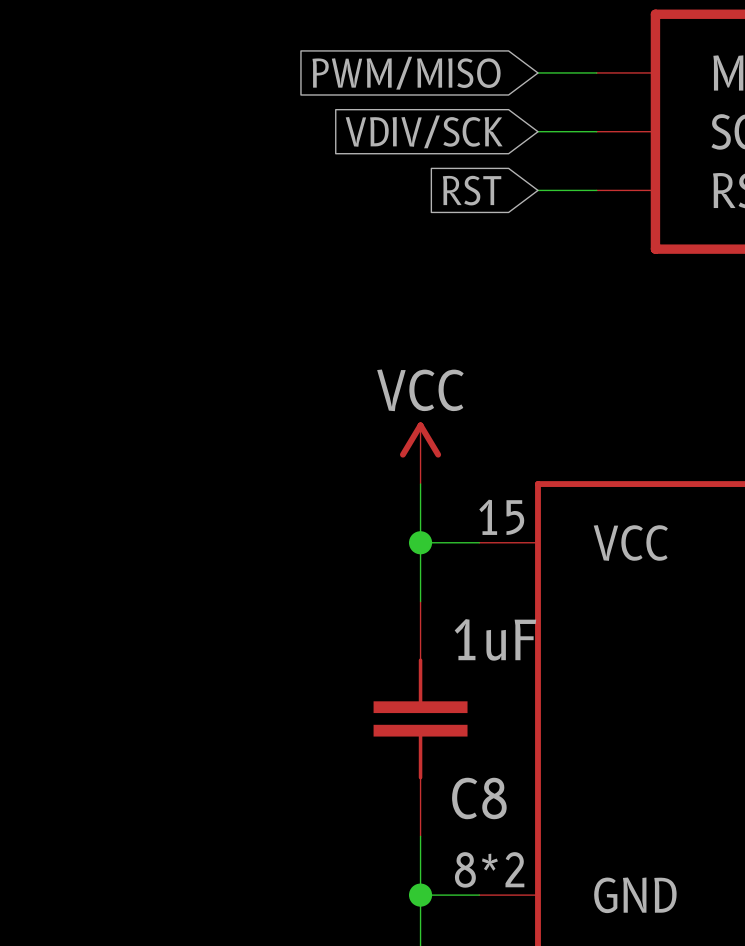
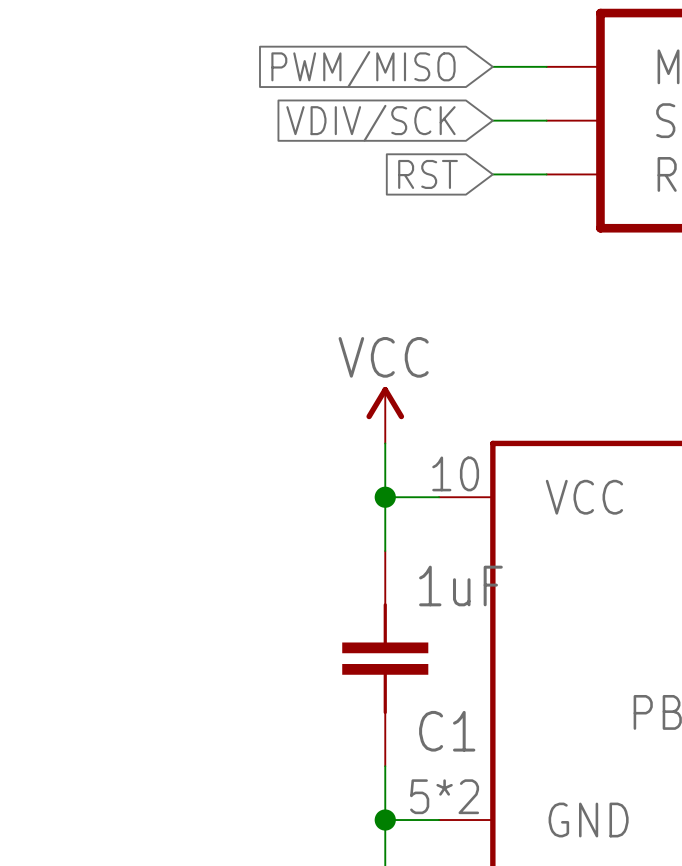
part pin number: 15 (501, 517) -> 10 (455, 473)
C8 name: C8 (479, 798) -> C1 (447, 731)
part pin number: 8*2 (489, 869) -> 5*2 (444, 796)

